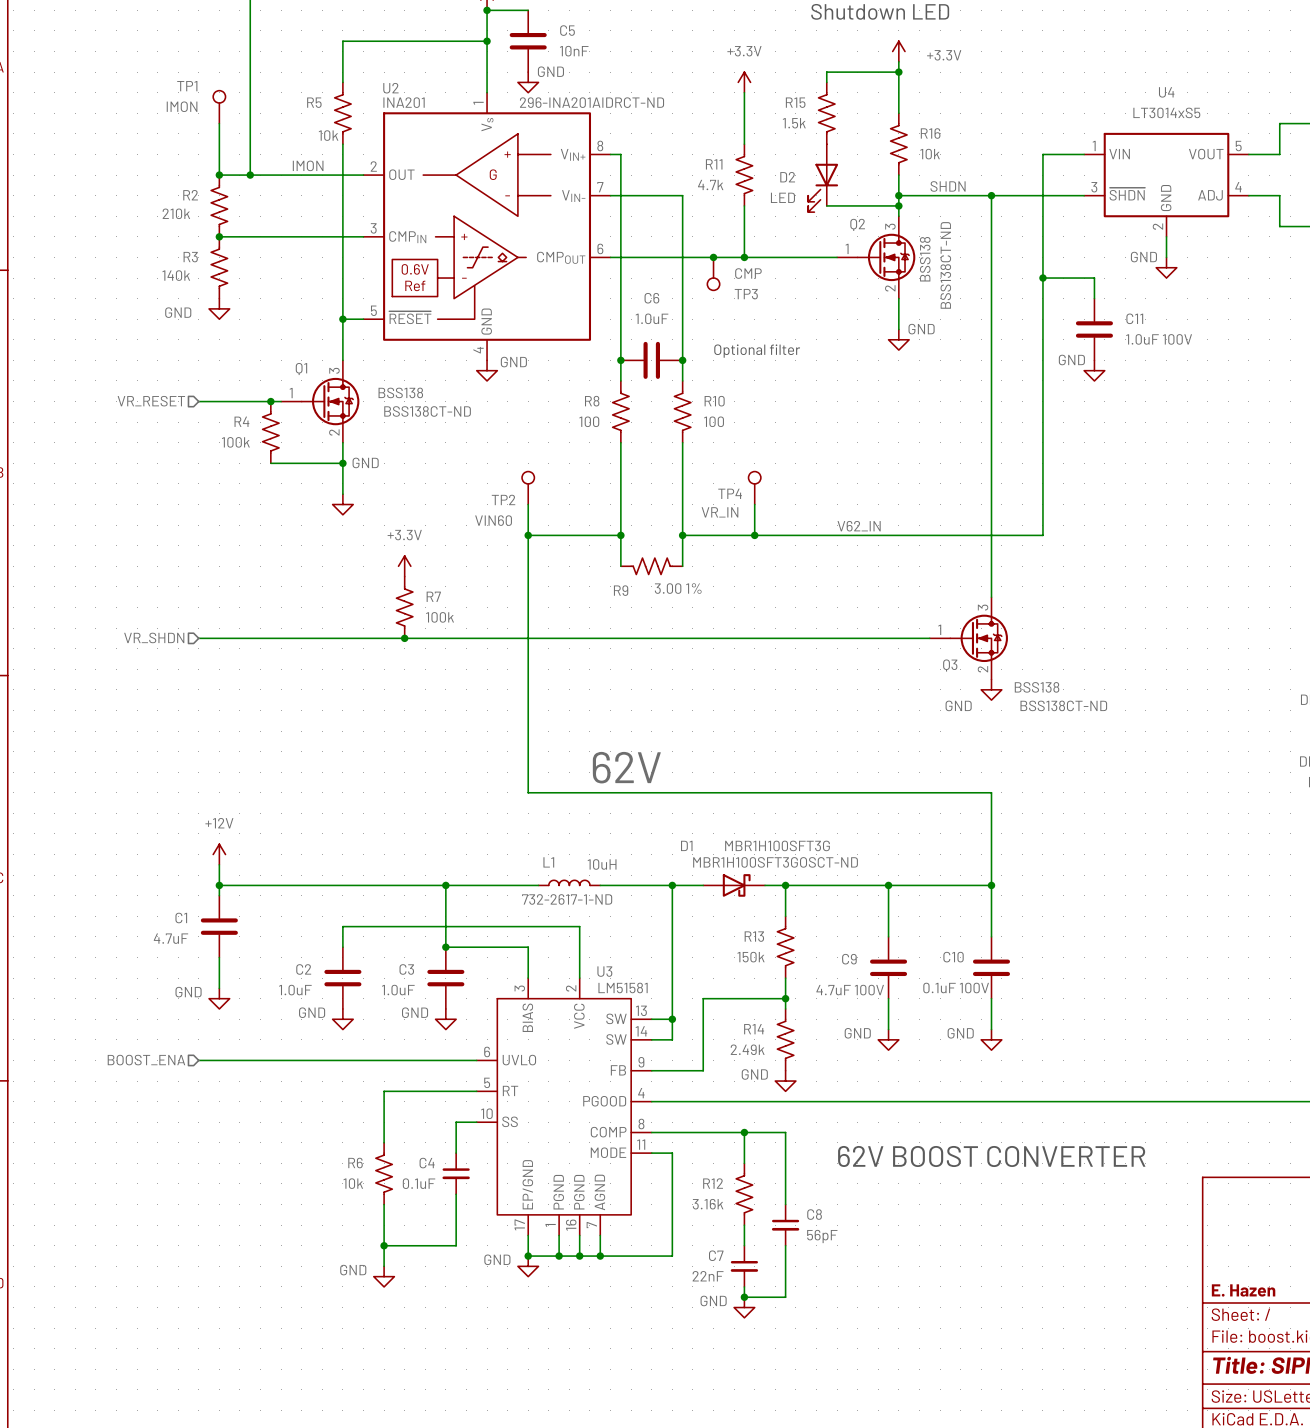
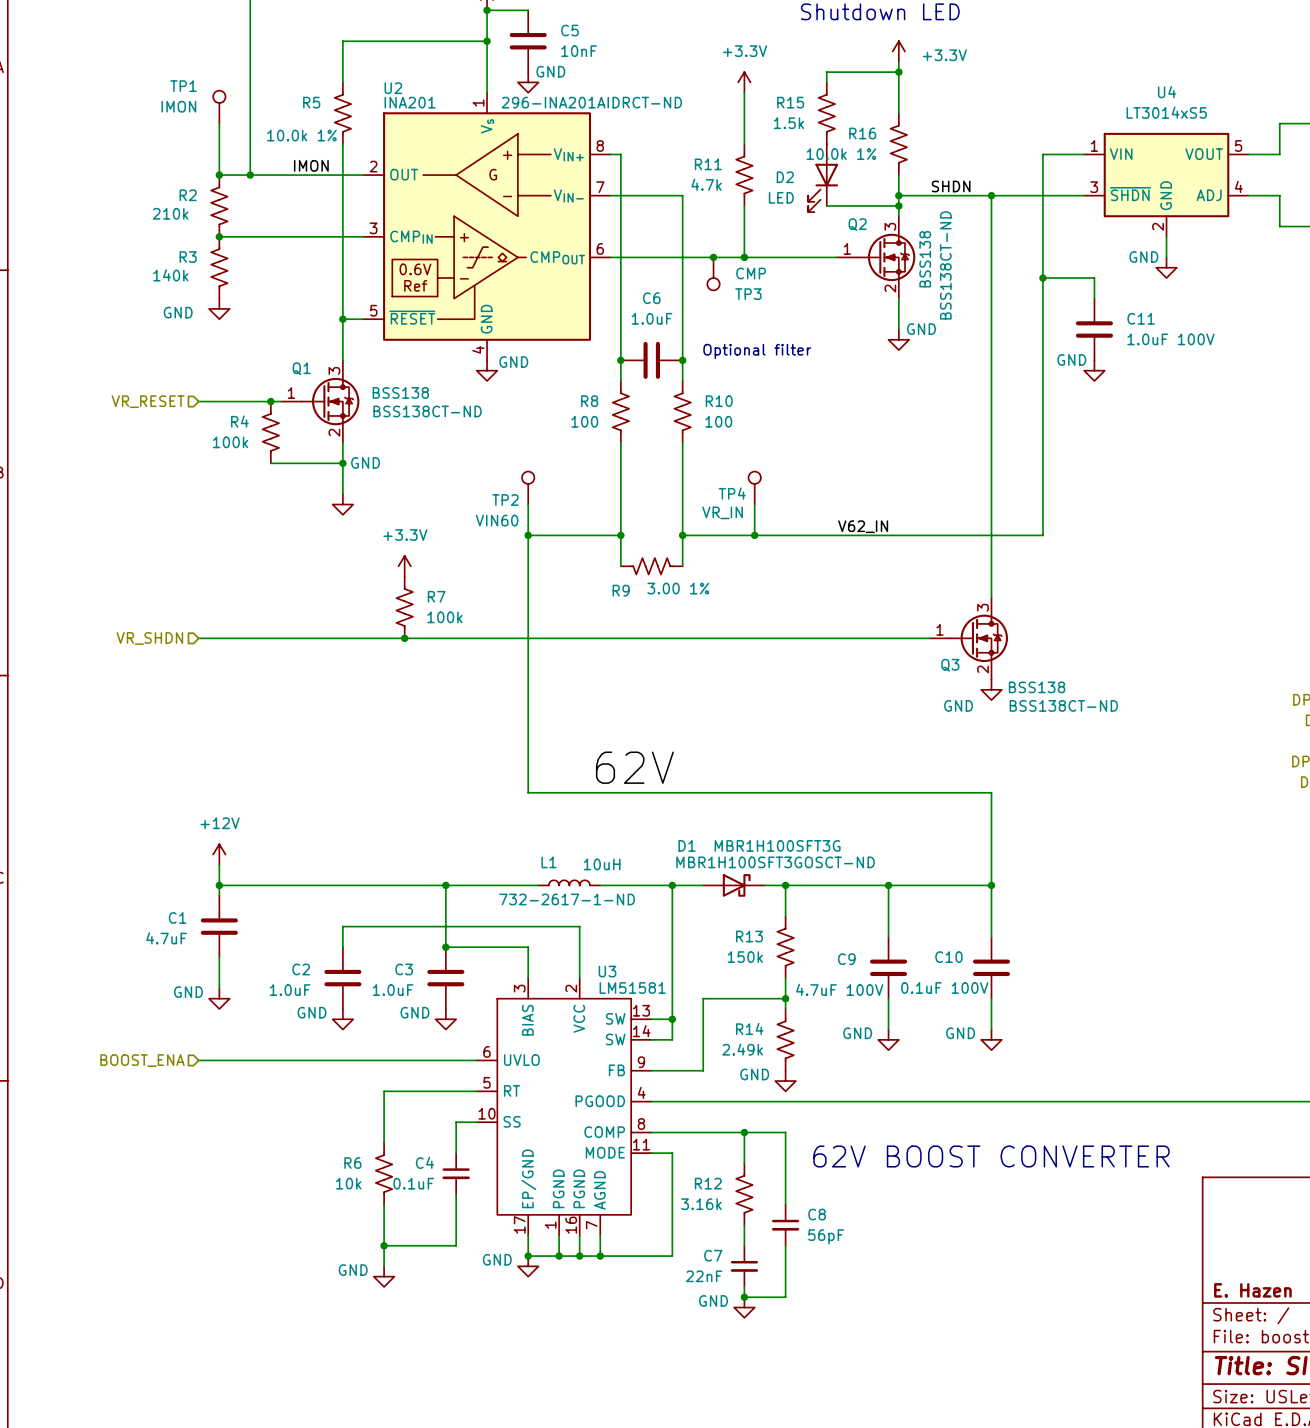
R16 name position: R16 (930, 133) -> R16 (862, 133)
R5 value: 10k (328, 135) -> 10.0k 1% (301, 135)
R16 value: 10k (930, 154) -> 10.0k 1% (841, 154)

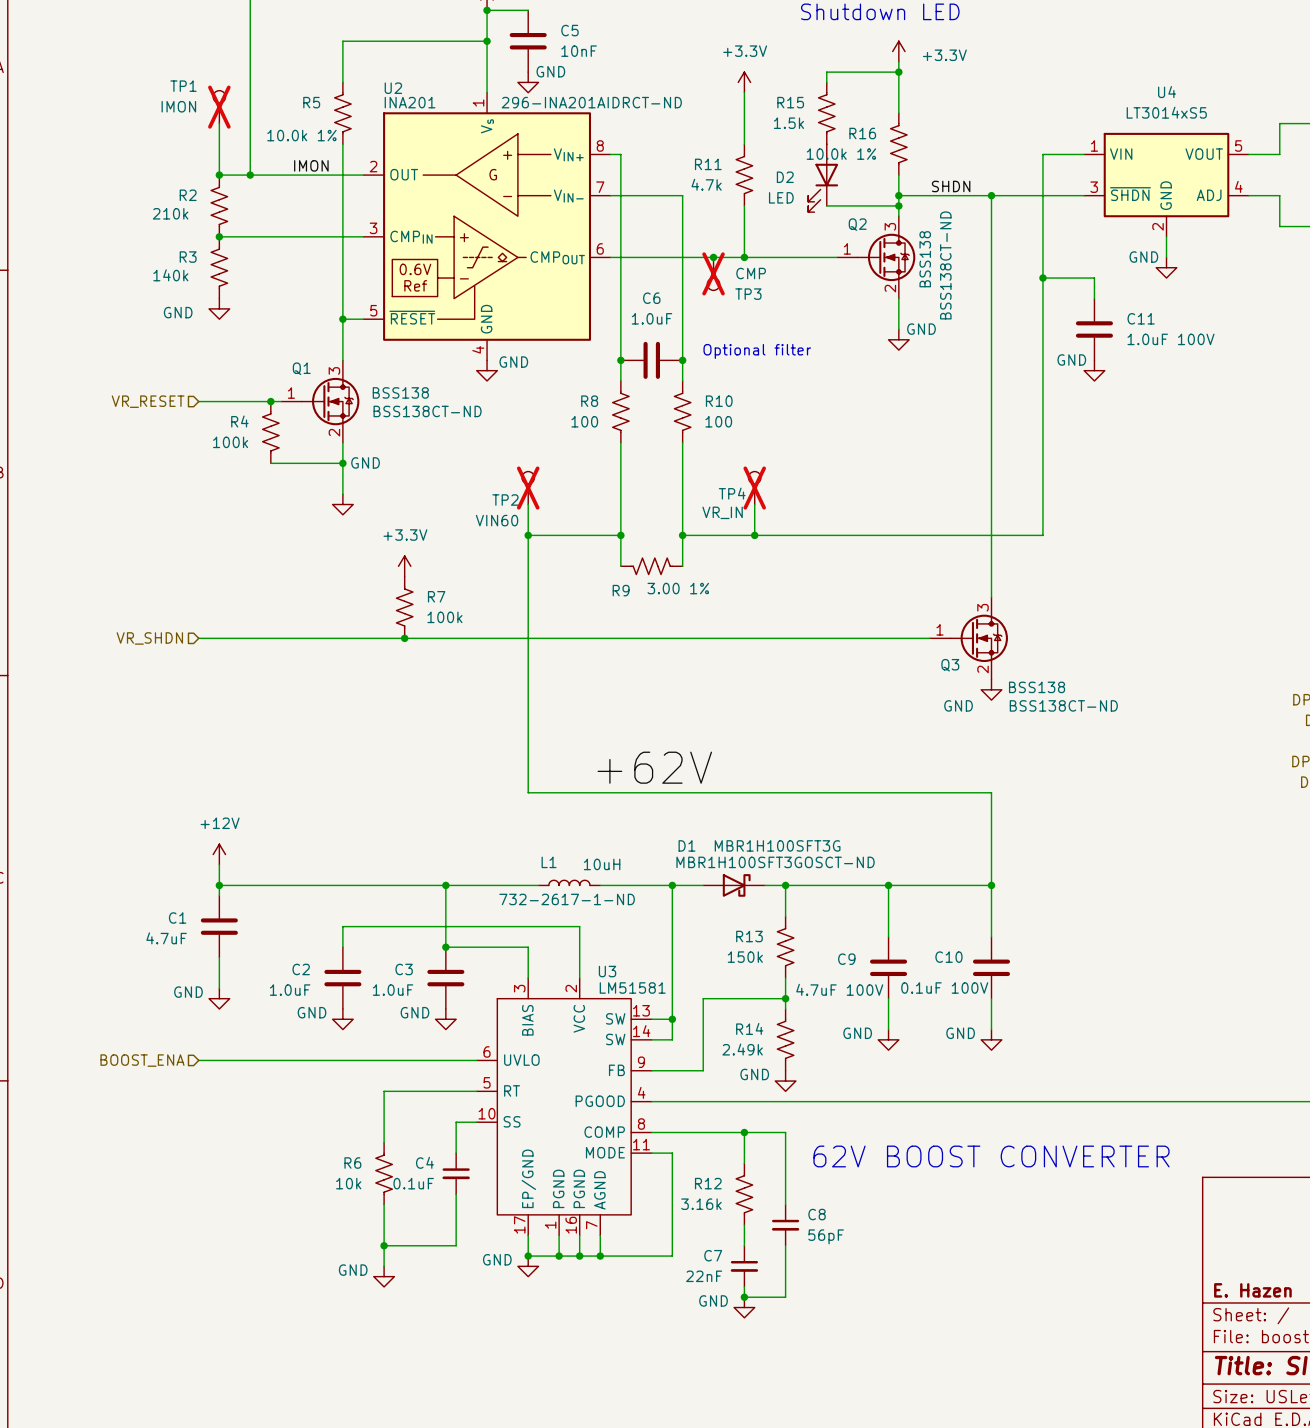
TP1 do-not-place cross: none -> (219, 107)
TP3 do-not-place cross: none -> (713, 273)
TP2 do-not-place cross: none -> (528, 488)
TP4 do-not-place cross: none -> (754, 488)
label: V62_IN (863, 526) -> none
label: 62V (634, 767) -> +62V (654, 767)

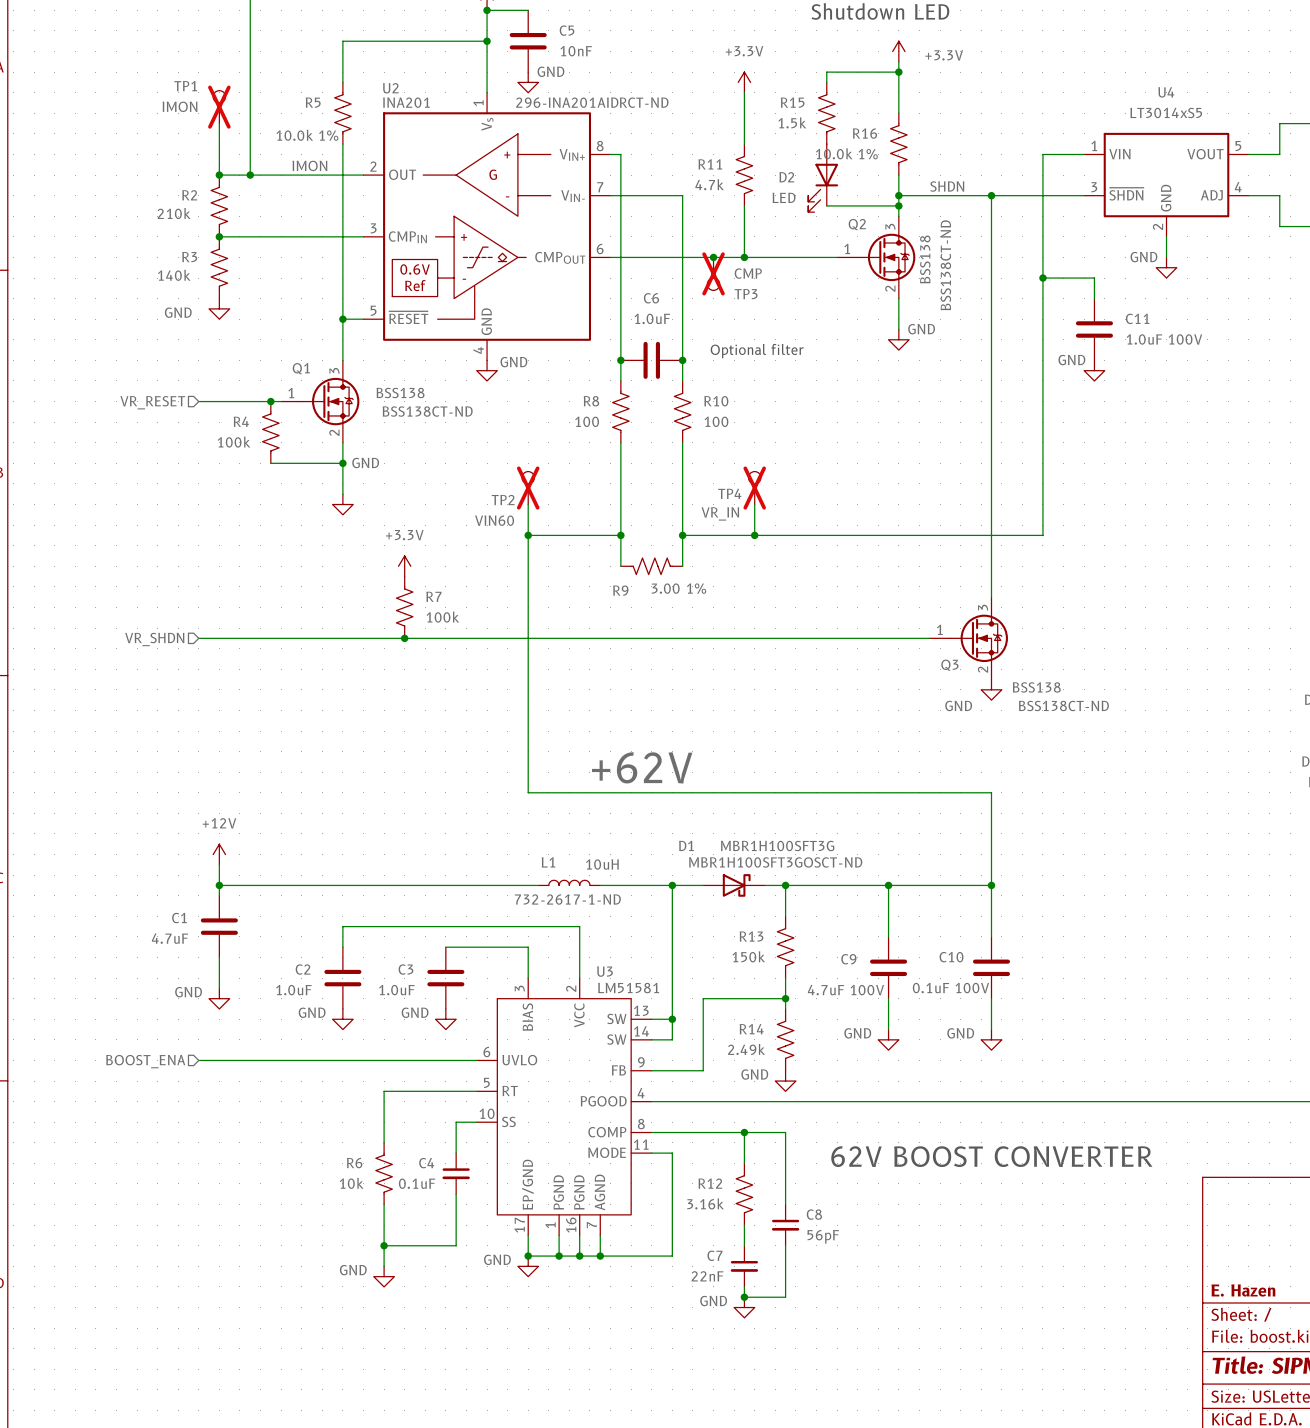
wire: (445, 885) (445, 947) -> none
junction: (445, 885) -> none
junction: (445, 947) -> none

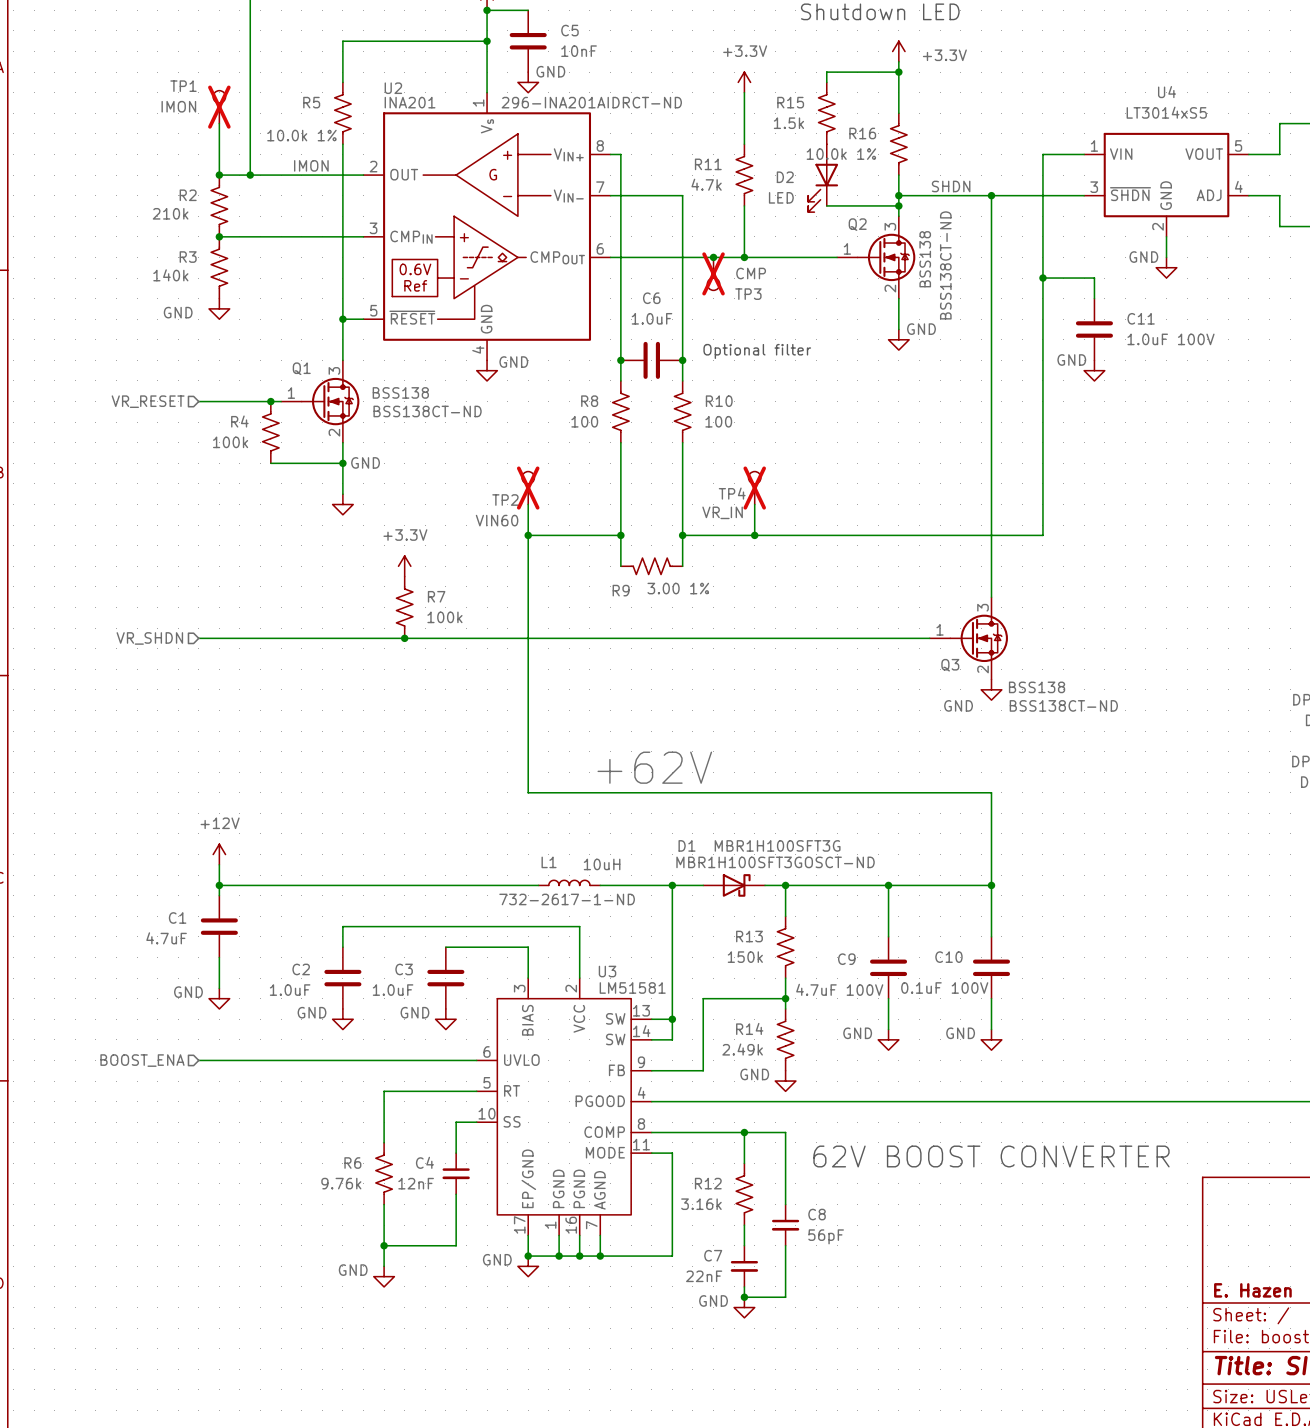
R6 value: 10k (351, 1183) -> 9.76k (341, 1183)
C4 value: 0.1uF (417, 1183) -> 12nF (416, 1183)

